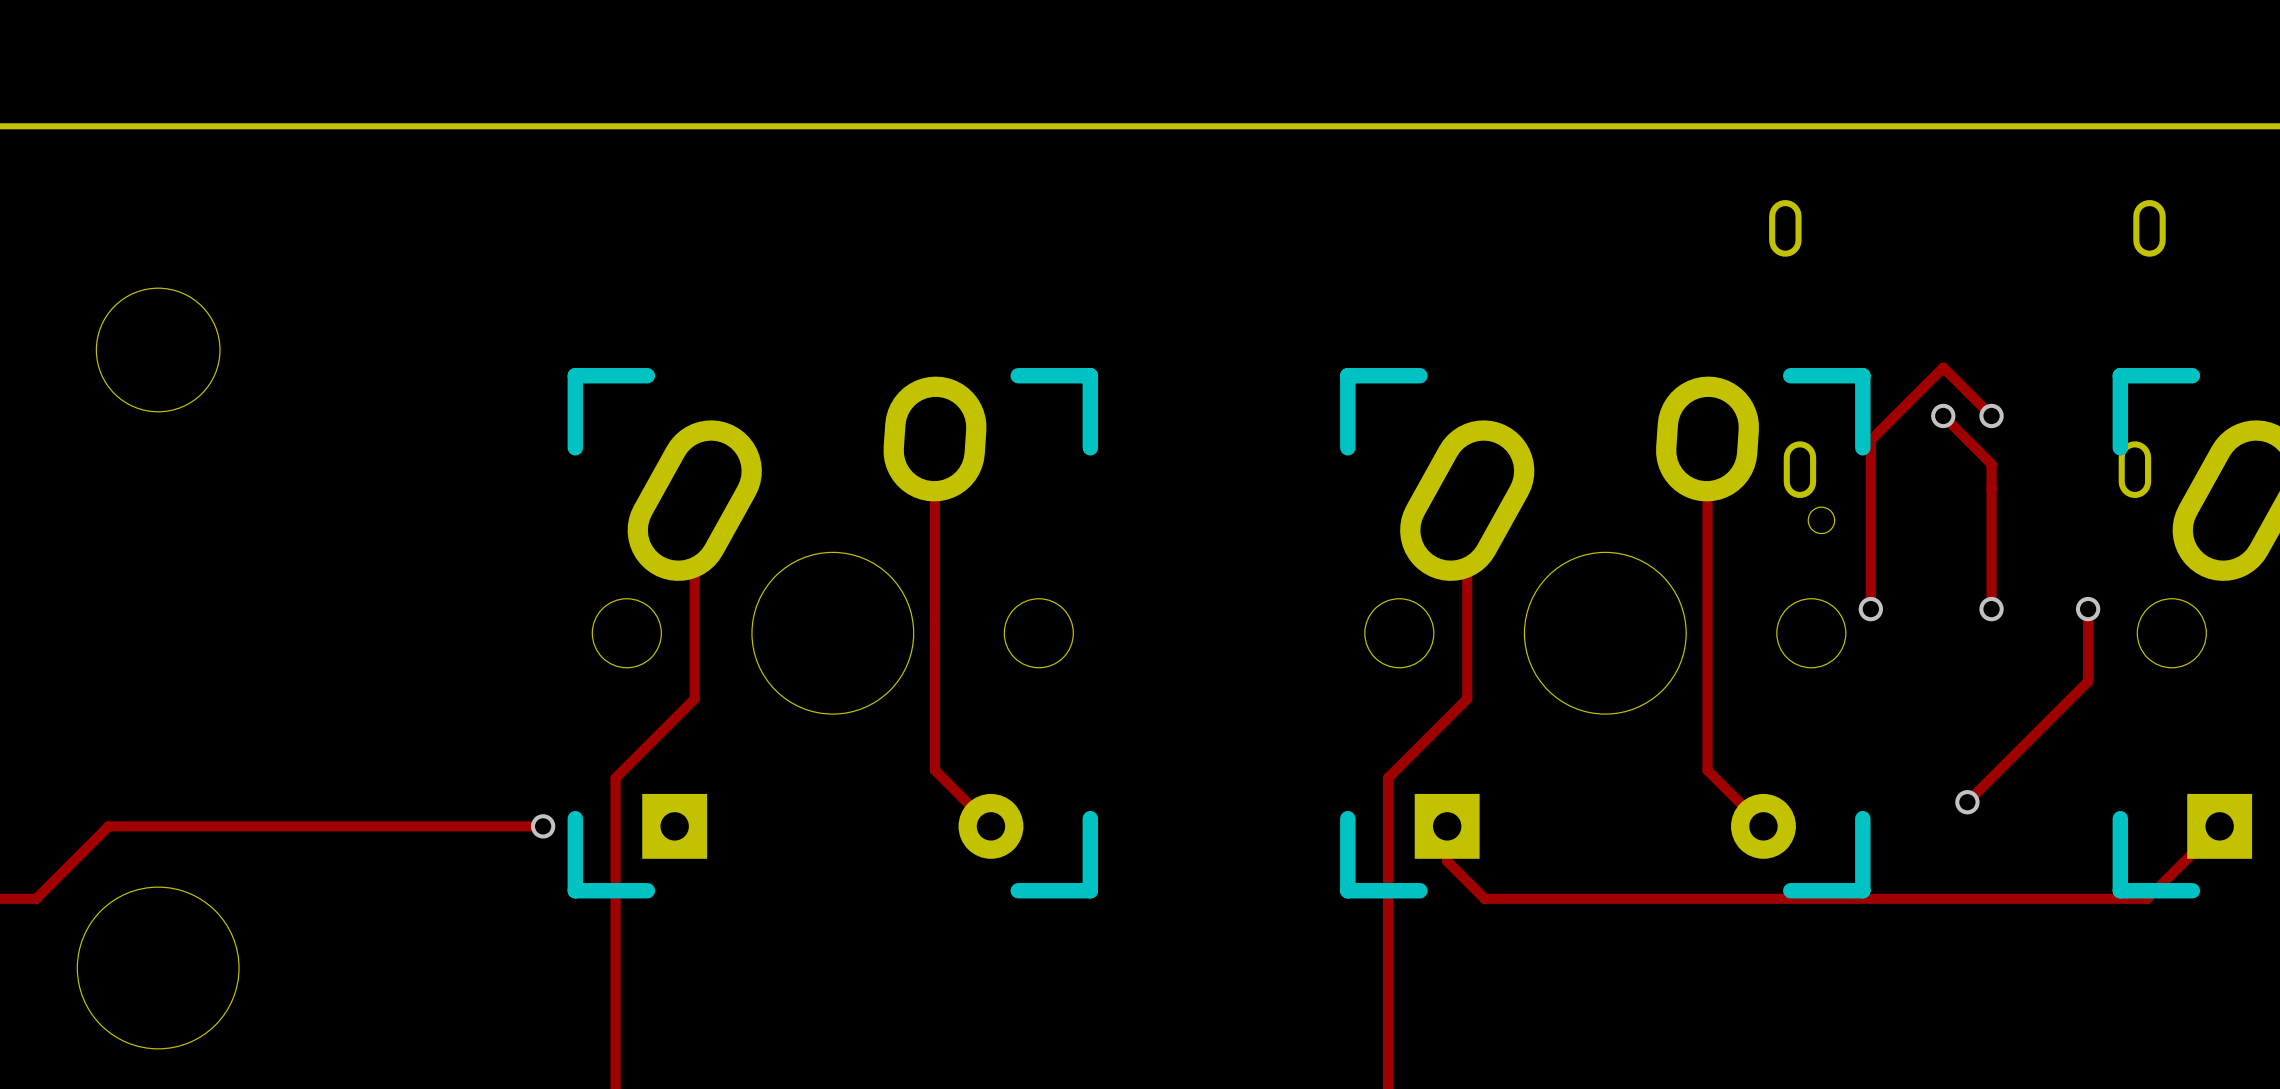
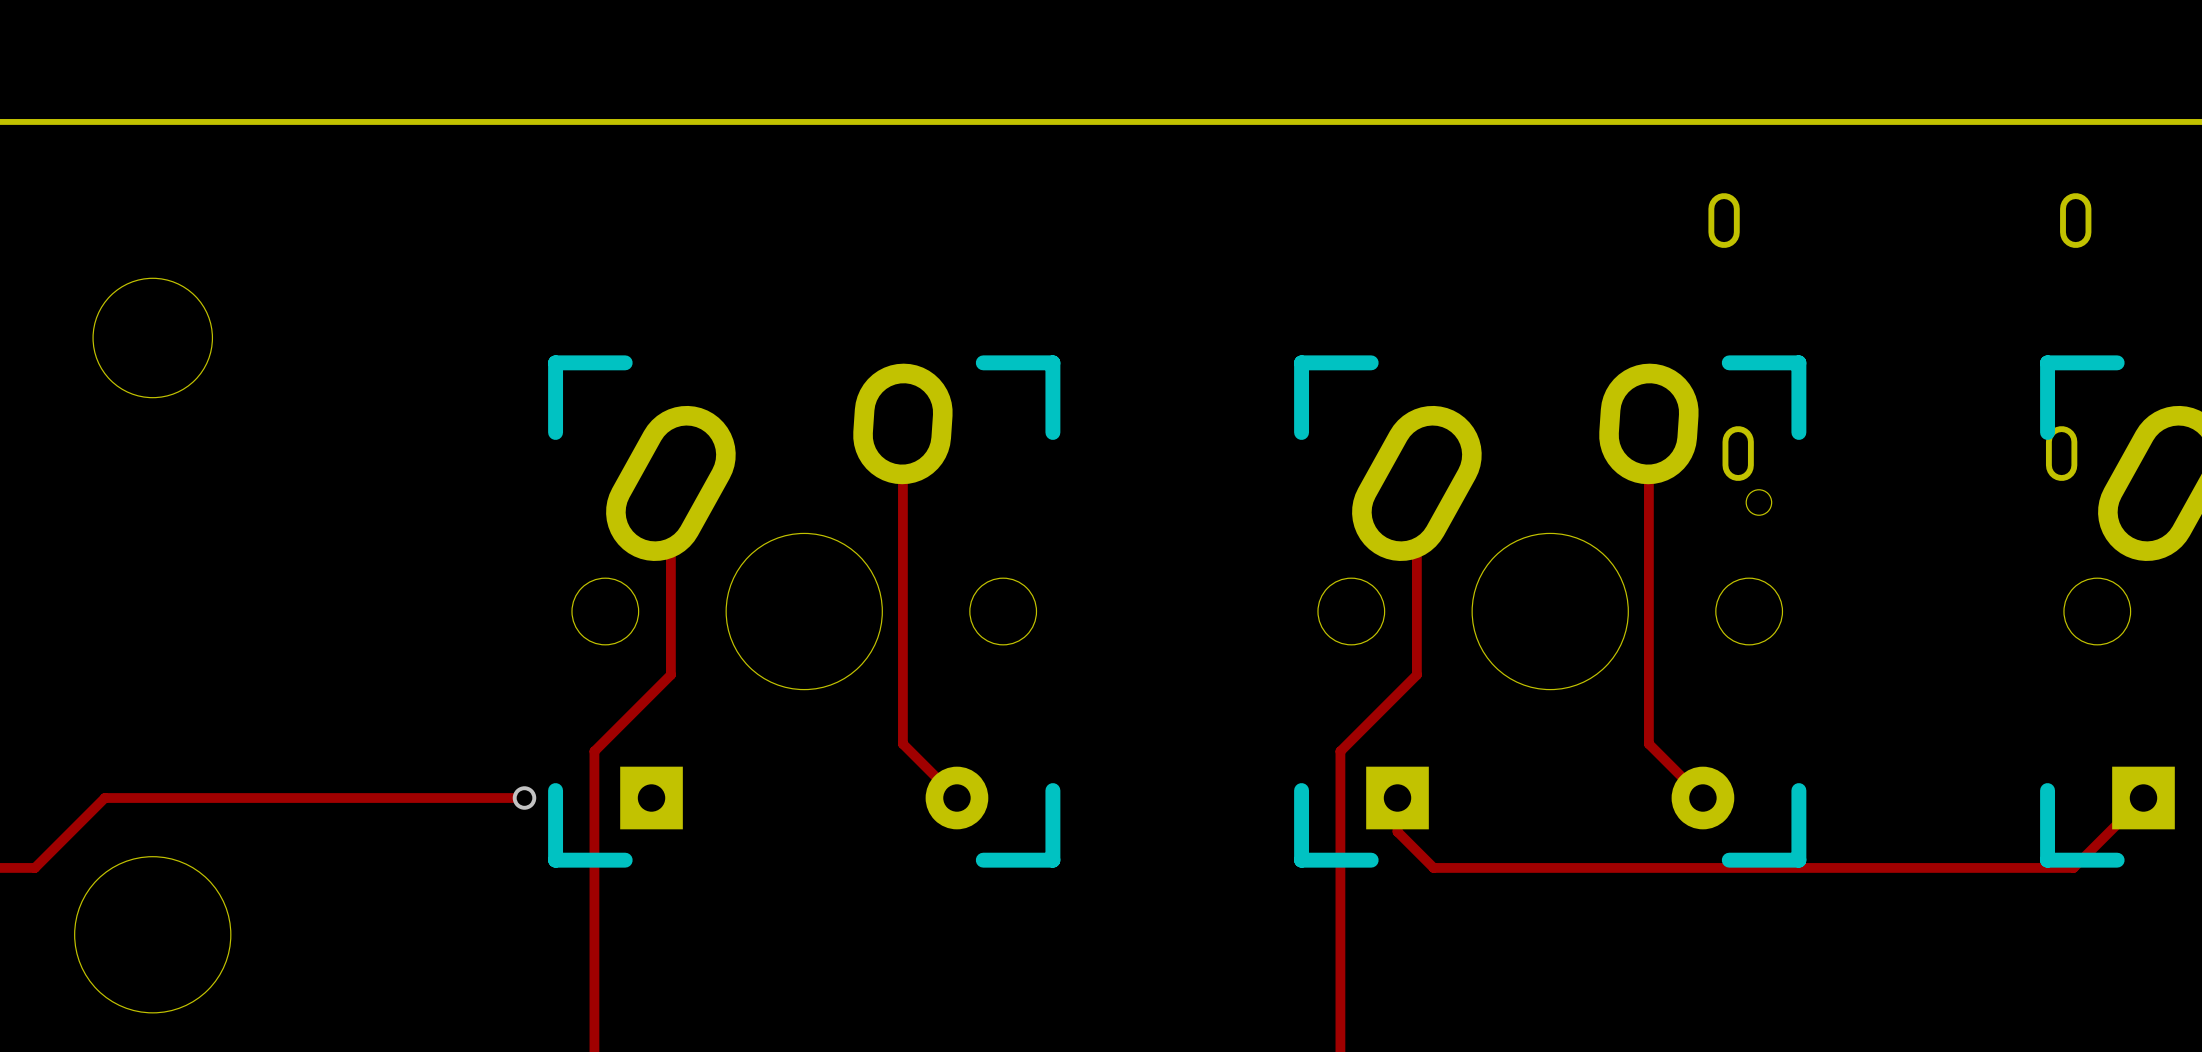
track: (1943, 415) (1991, 464) (1991, 609) -> none
via: (1943, 415) -> none
track: (1991, 415) (1943, 367) (1870, 440) (1870, 609) -> none
via: (1991, 415) -> none
via: (1870, 609) -> none
via: (1991, 609) -> none
track: (2088, 609) (2088, 681) (1967, 802) -> none
via: (2088, 609) -> none
via: (1967, 802) -> none

